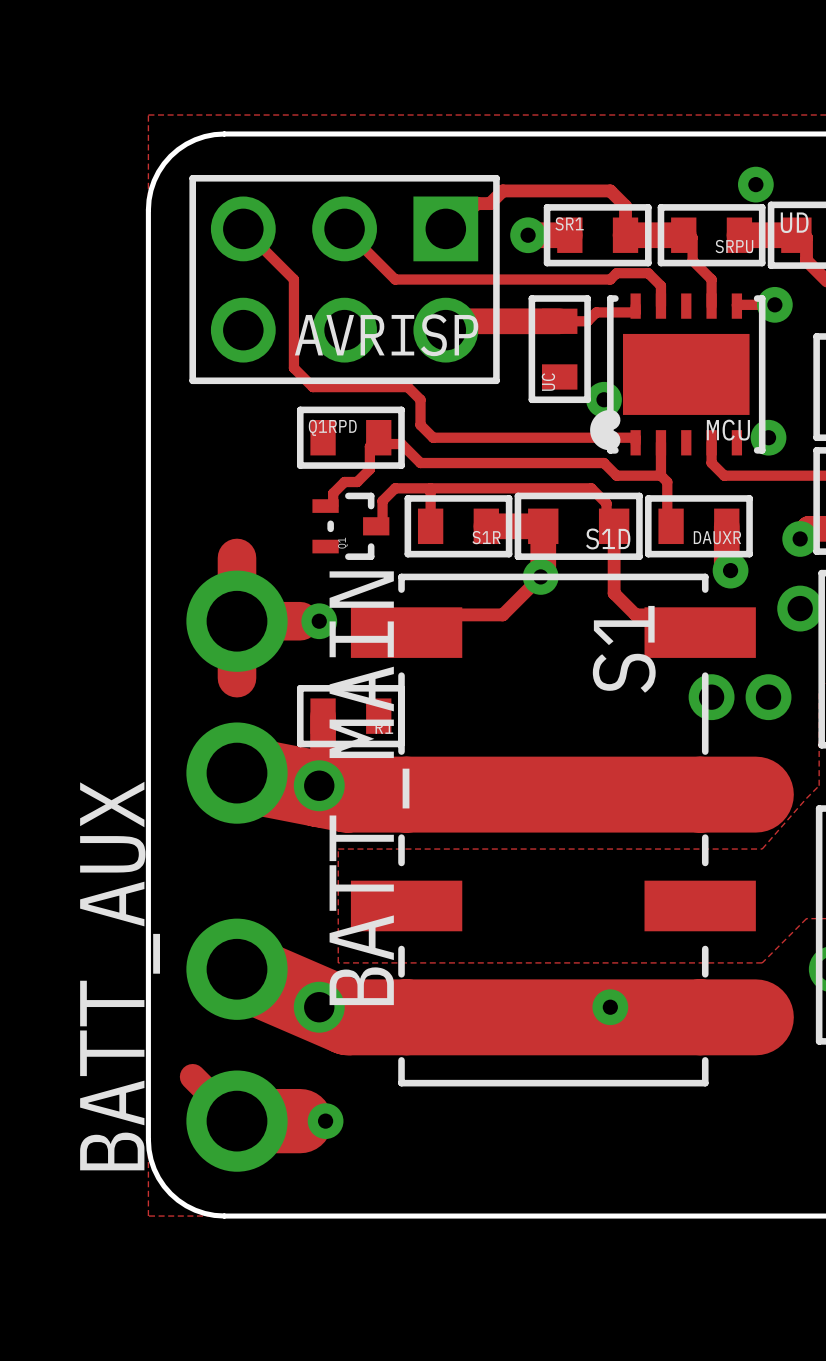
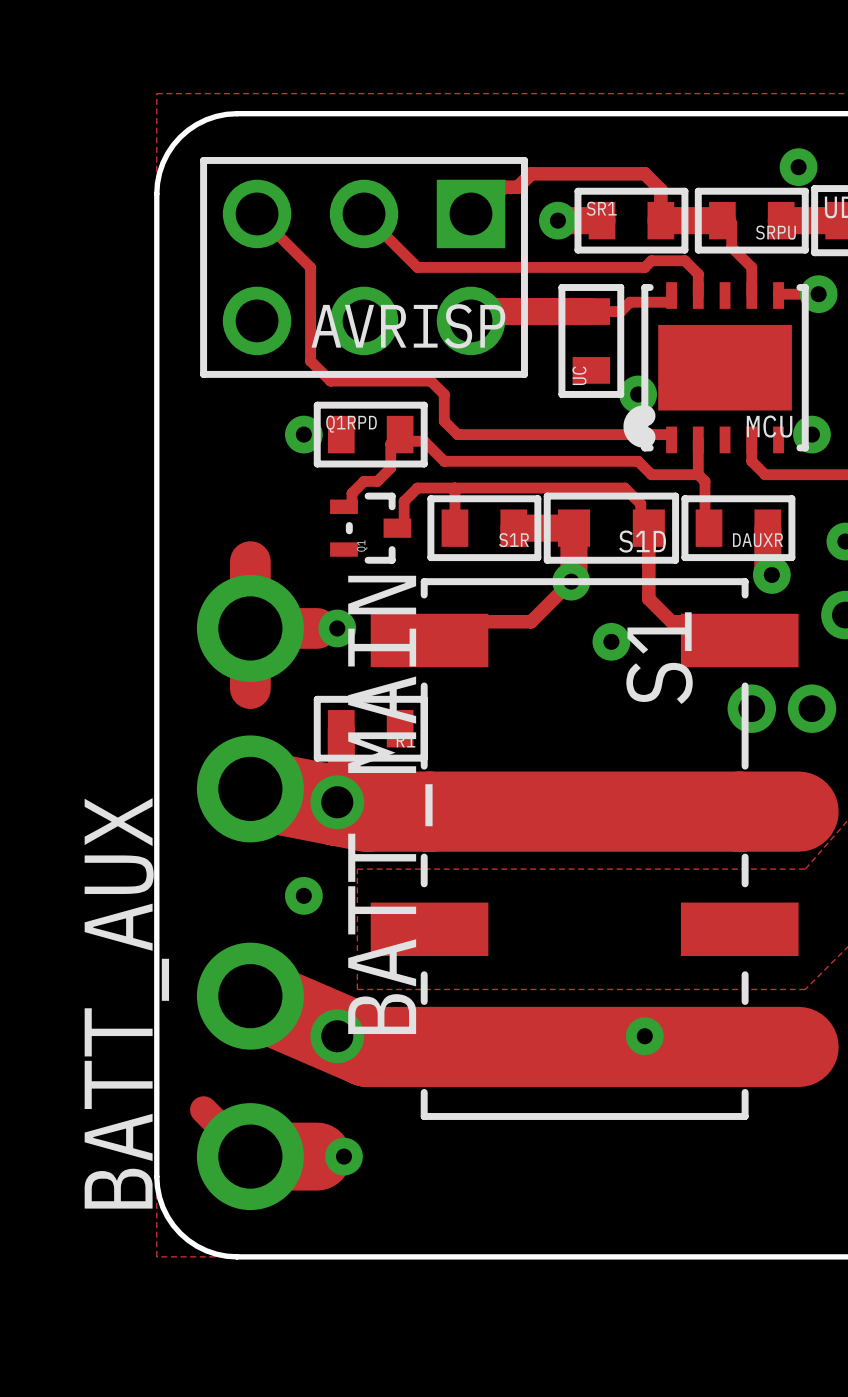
via: none -> (303, 434)
via: none -> (611, 641)
via: none -> (303, 895)

